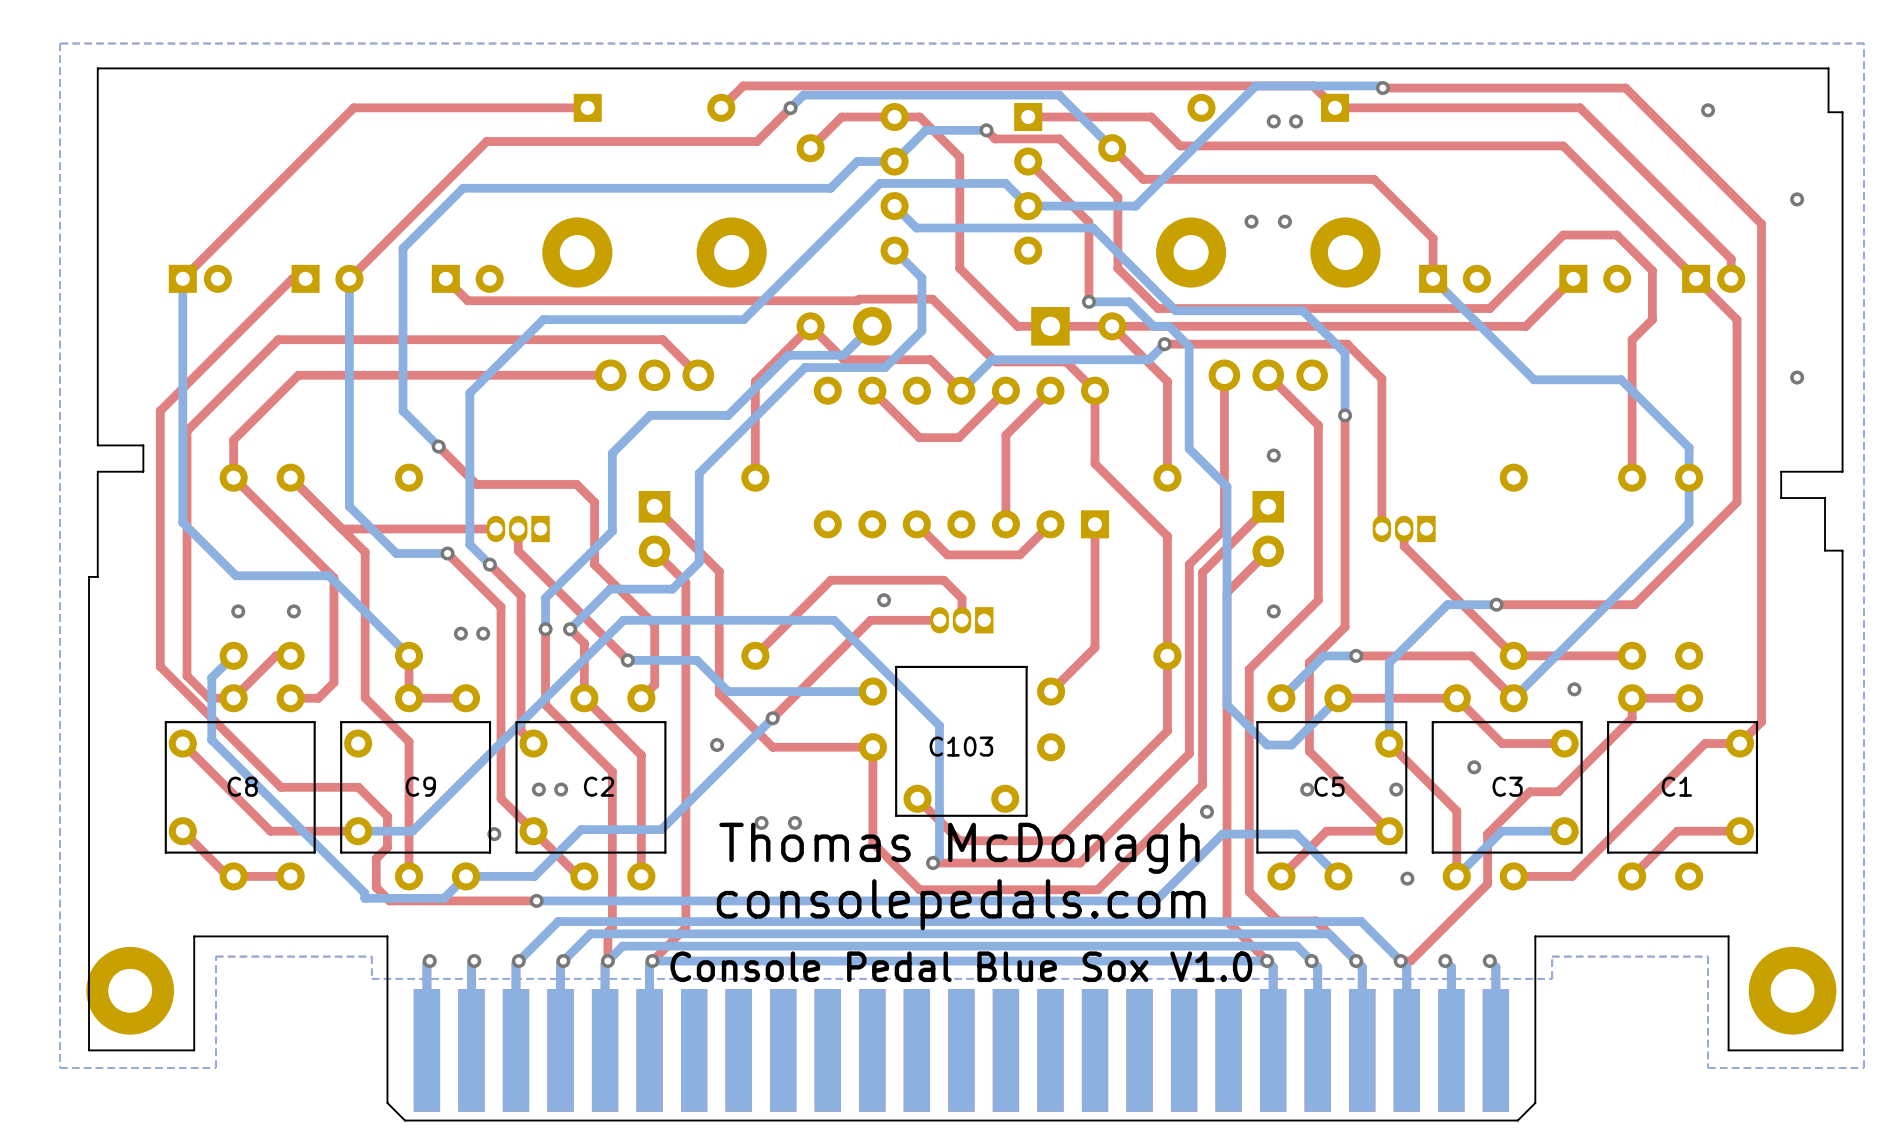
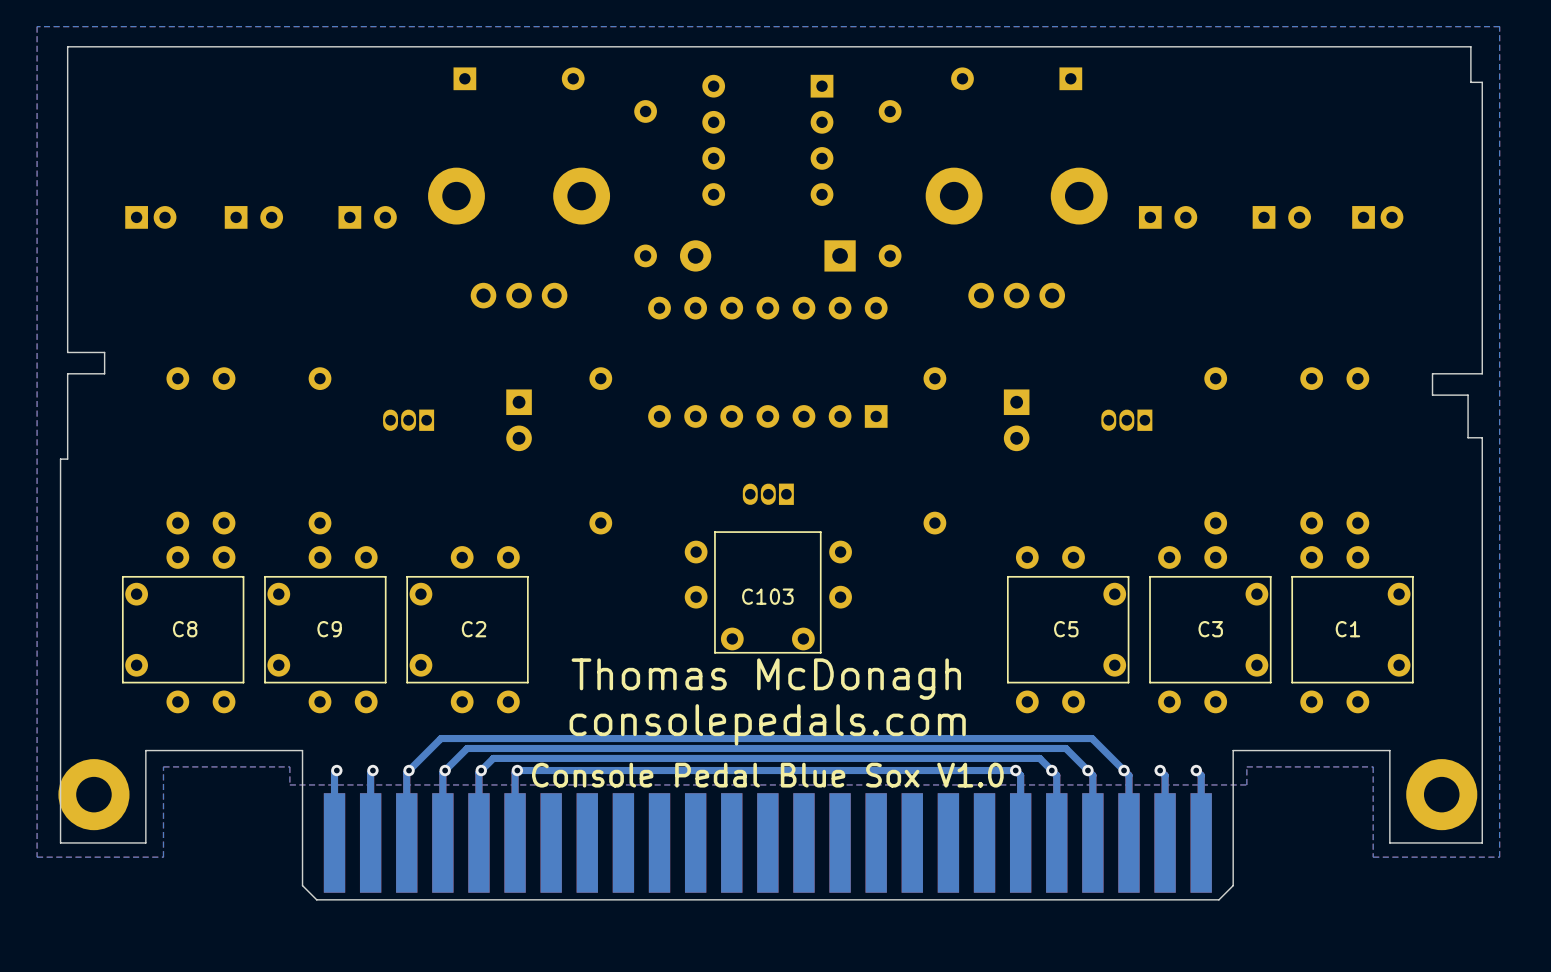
bottom track: (1382, 88) (1380, 85) (1255, 85) (1135, 206) (1028, 206) (1005, 183) (879, 183) (743, 319) (543, 319) (469, 393) (469, 544) (489, 564) -> none
top track: (1382, 88) (1625, 88) (1761, 223) (1761, 721) (1739, 743) (1705, 743) (1572, 876) (1513, 876) -> none
via: (1382, 88) -> none
top track: (587, 107) (353, 107) (182, 278) -> none
top track: (721, 107) (743, 85) (1313, 85) (1335, 107) (1580, 107) (1731, 258) (1731, 278) -> none
bottom track: (790, 108) (803, 95) (1059, 95) (1112, 148) -> none
top track: (790, 108) (757, 141) (486, 141) (349, 278) -> none
via: (790, 108) -> none
via: (1708, 110) -> none
top track: (1028, 117) (1151, 117) (1180, 145) (1563, 145) (1737, 319) (1737, 502) (1634, 604) (1496, 604) -> none
via: (1273, 121) -> none
via: (1296, 121) -> none
bottom track: (986, 130) (925, 130) (894, 161) (857, 161) (830, 188) (463, 188) (403, 248) (403, 410) (438, 446) -> none
top track: (986, 130) (995, 138) (1059, 138) (1117, 197) (1117, 268) (1157, 308) (1489, 308) (1563, 235) (1616, 235) (1652, 270) (1652, 319) (1632, 339) (1632, 477) -> none
via: (986, 130) -> none
top track: (810, 148) (841, 117) (919, 117) (959, 157) (959, 268) (1017, 326) (1525, 326) (1573, 278) -> none
top track: (1112, 148) (1143, 179) (1374, 179) (1433, 238) (1433, 278) -> none
top track: (1028, 161) (1088, 222) (1088, 301) -> none
via: (1797, 199) -> none
bottom track: (894, 206) (916, 228) (1093, 228) (1175, 310) (1302, 310) (1345, 353) (1345, 415) -> none
via: (1251, 221) -> none
via: (1284, 221) -> none
bottom track: (894, 250) (921, 277) (921, 330) (885, 367) (804, 367) (699, 473) (699, 562) (672, 589) (610, 589) (570, 629) -> none
bottom track: (182, 278) (182, 522) (236, 575) (328, 575) (409, 655) -> none
top track: (305, 278) (292, 278) (160, 410) (160, 666) (281, 787) (358, 787) (387, 816) (387, 847) (376, 858) (376, 887) (389, 900) (536, 900) -> none
bottom track: (357, 278) (349, 278) (349, 506) (396, 553) (447, 553) -> none
top track: (445, 278) (467, 300) (932, 299) (995, 361) (1066, 361) (1095, 390) (1095, 463) (1167, 536) (1167, 731) (1057, 840) (959, 840) (917, 798) -> none
bottom track: (1433, 278) (1534, 379) (1621, 379) (1689, 447) (1689, 522) (1513, 698) -> none
bottom track: (1088, 301) (1129, 301) (1153, 326) (1169, 326) (1189, 346) (1189, 448) (1227, 486) (1227, 704) (1267, 745) (1291, 745) (1338, 698) -> none
via: (1088, 301) -> none
bottom track: (872, 326) (843, 355) (788, 355) (728, 415) (650, 415) (612, 453) (612, 531) (545, 598) (545, 629) -> none
top track: (1112, 326) (1167, 381) (1167, 477) -> none
bottom track: (1164, 344) (1149, 359) (992, 359) (961, 390) -> none
top track: (1164, 344) (1347, 344) (1381, 378) (1381, 528) -> none
via: (1164, 344) -> none
top track: (610, 375) (298, 375) (233, 440) (233, 477) (333, 578) (333, 682) (318, 698) (290, 698) -> none
top track: (698, 375) (662, 339) (278, 339) (187, 431) (187, 675) (209, 698) (233, 698) (276, 655) (290, 655) -> none
top track: (1224, 375) (1224, 529) (1189, 564) (1189, 753) (1080, 863) (933, 863) -> none
top track: (1268, 375) (1318, 425) (1318, 600) (1249, 669) (1249, 892) (1278, 920) (1316, 920) (1356, 961) -> none
via: (1797, 377) -> none
top track: (961, 390) (930, 359) (843, 359) (810, 326) (755, 381) (755, 477) -> none
top track: (1005, 390) (958, 437) (919, 437) (872, 390) -> none
top track: (1050, 390) (1005, 435) (1005, 524) -> none
top track: (1345, 415) (1345, 626) (1309, 662) (1309, 751) (1389, 831) (1326, 831) (1281, 876) -> none
via: (1345, 415) -> none
top track: (438, 446) (476, 484) (576, 484) (594, 502) (594, 564) (654, 624) (654, 684) (641, 698) -> none
via: (438, 446) -> none
via: (1273, 455) -> none
top track: (290, 477) (365, 552) (365, 697) (409, 741) (409, 876) -> none
top track: (1268, 506) (1202, 572) (1202, 785) (1097, 889) (919, 889) (872, 843) (872, 747) (772, 747) (719, 693) (719, 571) (654, 506) -> none
top track: (1050, 524) (1019, 554) (947, 554) (916, 524) -> none
top track: (1095, 524) (1095, 647) (1051, 691) -> none
top track: (496, 528) (341, 528) -> none
top track: (518, 528) (518, 550) (627, 660) -> none
top track: (1404, 528) (1404, 546) (1513, 655) (1632, 655) -> none
top track: (654, 551) (685, 582) (685, 927) (652, 961) -> none
top track: (1268, 551) (1227, 592) (1227, 920) (1267, 961) -> none
top track: (447, 553) (501, 606) (501, 798) (578, 876) (584, 876) -> none
via: (447, 553) -> none
top track: (489, 564) (521, 595) (521, 731) (533, 743) -> none
via: (489, 564) -> none
via: (884, 600) -> none
bottom track: (1496, 604) (1447, 604) (1389, 662) (1389, 743) -> none
via: (1496, 604) -> none
via: (238, 611) -> none
via: (293, 611) -> none
via: (1273, 611) -> none
top track: (939, 620) (870, 620) (772, 718) -> none
top track: (962, 620) (962, 598) (943, 580) (830, 580) (755, 655) -> none
top track: (545, 629) (545, 704) (612, 771) (612, 927) (607, 932) (607, 961) -> none
via: (545, 629) -> none
top track: (570, 629) (584, 643) (584, 698) (641, 755) (641, 876) -> none
via: (570, 629) -> none
via: (460, 633) -> none
via: (483, 633) -> none
bottom track: (233, 655) (211, 677) (211, 740) (364, 893) (364, 898) (444, 898) (466, 876) (534, 876) (581, 829) (661, 829) (772, 718) -> none
top track: (409, 655) (409, 698) (466, 698) -> none
bottom track: (1356, 655) (1323, 655) (1281, 698) -> none
top track: (1356, 655) (1471, 655) (1513, 698) -> none
via: (1356, 655) -> none
bottom track: (627, 660) (696, 660) (728, 691) (872, 691) -> none
via: (627, 660) -> none
via: (1574, 689) -> none
top track: (1338, 698) (1456, 698) (1502, 743) (1564, 743) -> none
top track: (1689, 698) (1632, 698) (1632, 718) (1558, 791) (1529, 791) (1487, 834) (1487, 884) (1410, 961) (1400, 961) -> none
via: (772, 718) -> none
top track: (182, 743) (270, 831) (358, 831) -> none
top track: (1389, 743) (1456, 811) (1456, 876) -> none
via: (717, 745) -> none
via: (1474, 767) -> none
via: (538, 789) -> none
via: (561, 789) -> none
via: (1307, 789) -> none
via: (1396, 789) -> none
via: (1206, 811) -> none
via: (761, 822) -> none
via: (794, 822) -> none
top track: (182, 831) (228, 876) (290, 876) -> none
bottom track: (358, 831) (412, 831) (623, 620) (834, 620) (939, 725) (939, 856) (933, 863) -> none
bottom track: (1564, 831) (1501, 831) (1456, 876) -> none
top track: (1739, 831) (1677, 831) (1632, 876) -> none
via: (494, 834) -> none
via: (933, 863) -> none
bottom track: (1338, 876) (1296, 834) (1222, 834) (1155, 900) (536, 900) -> none
via: (1407, 878) -> none
via: (536, 900) -> none

